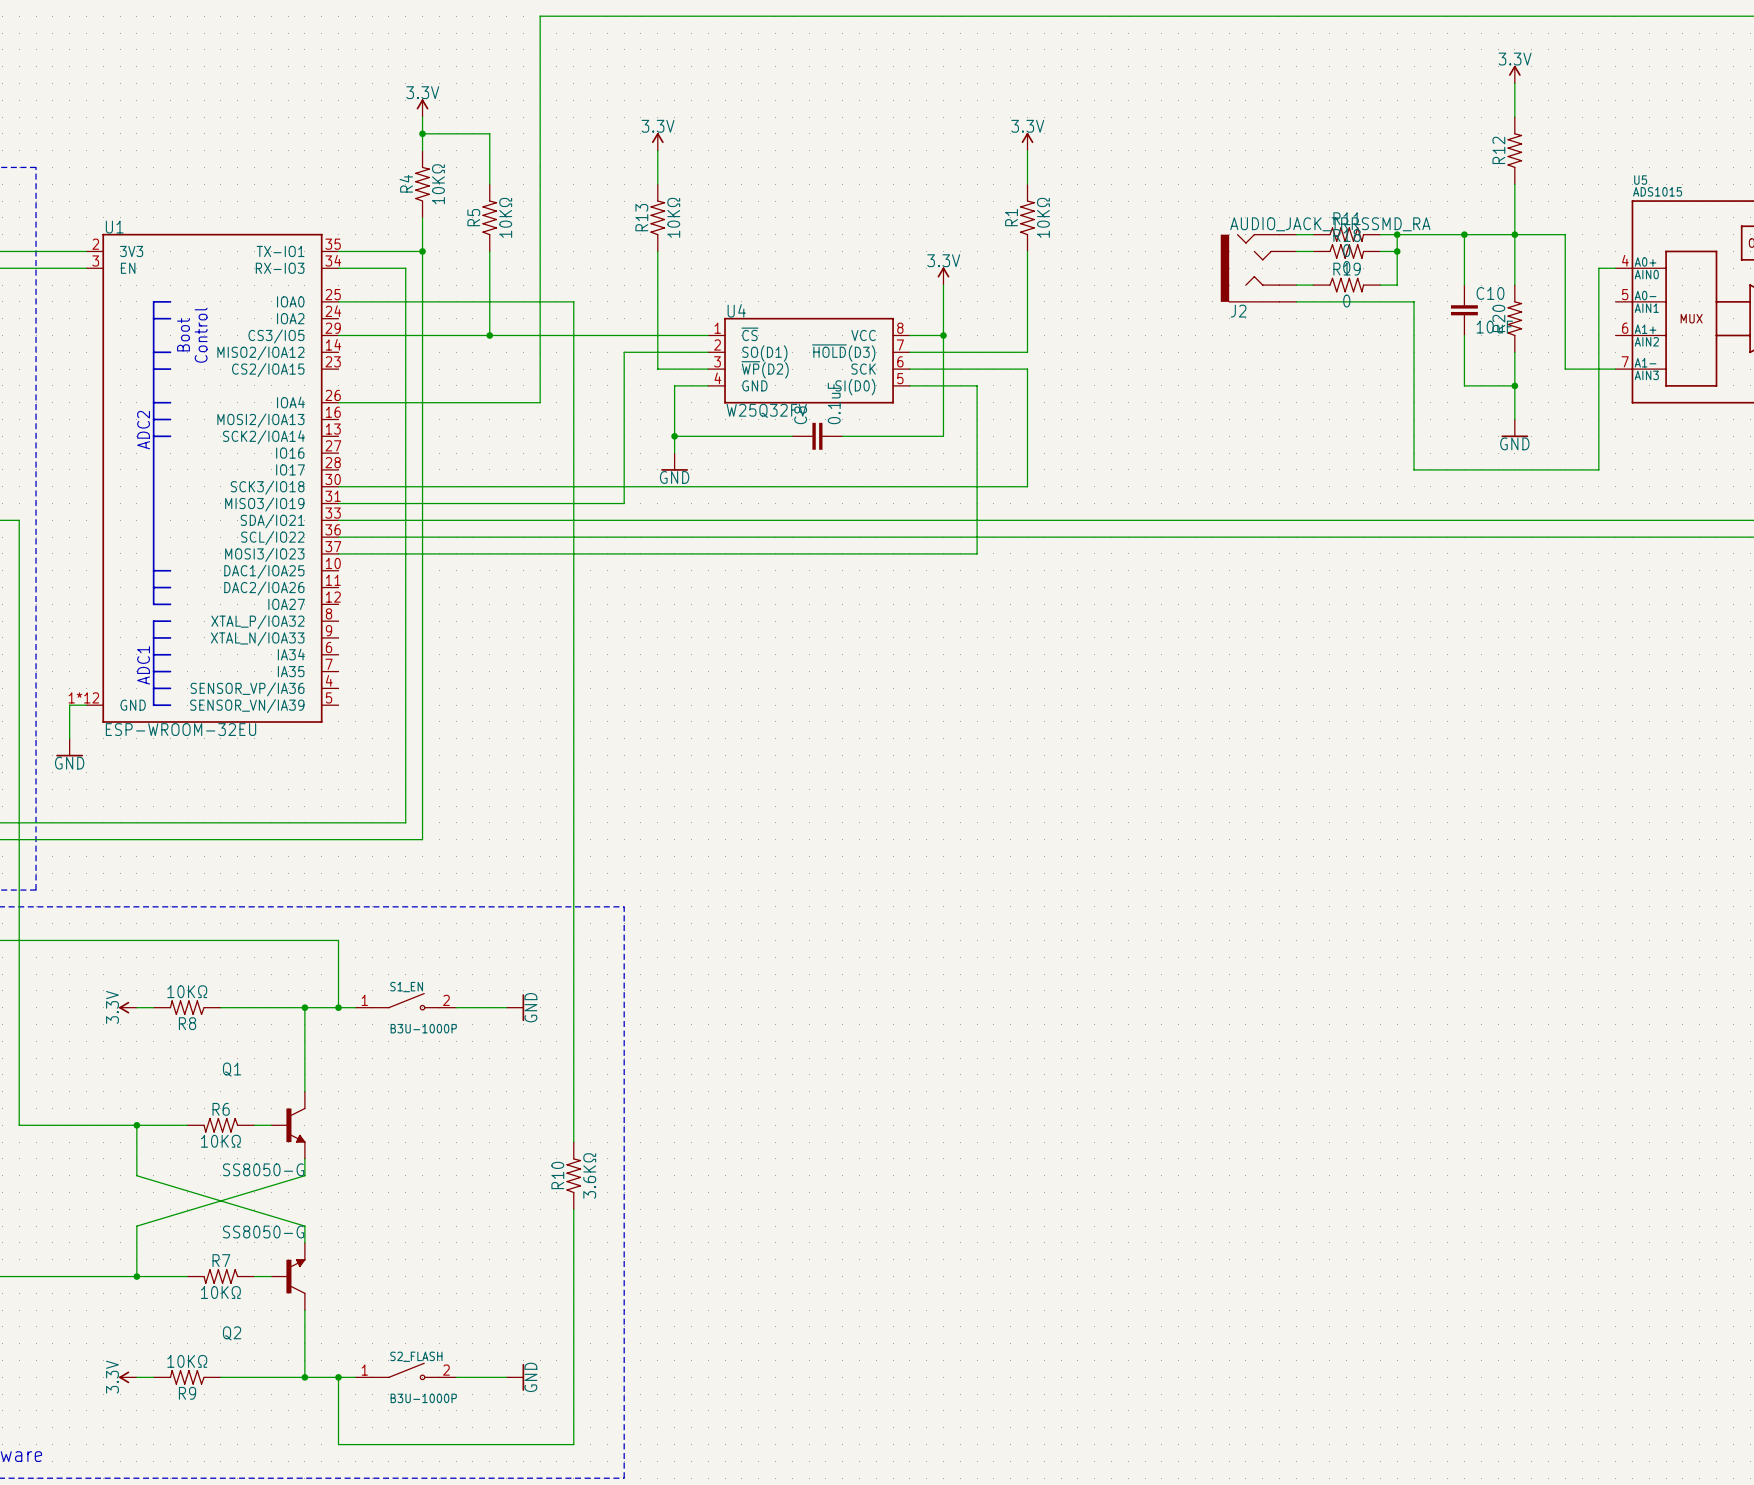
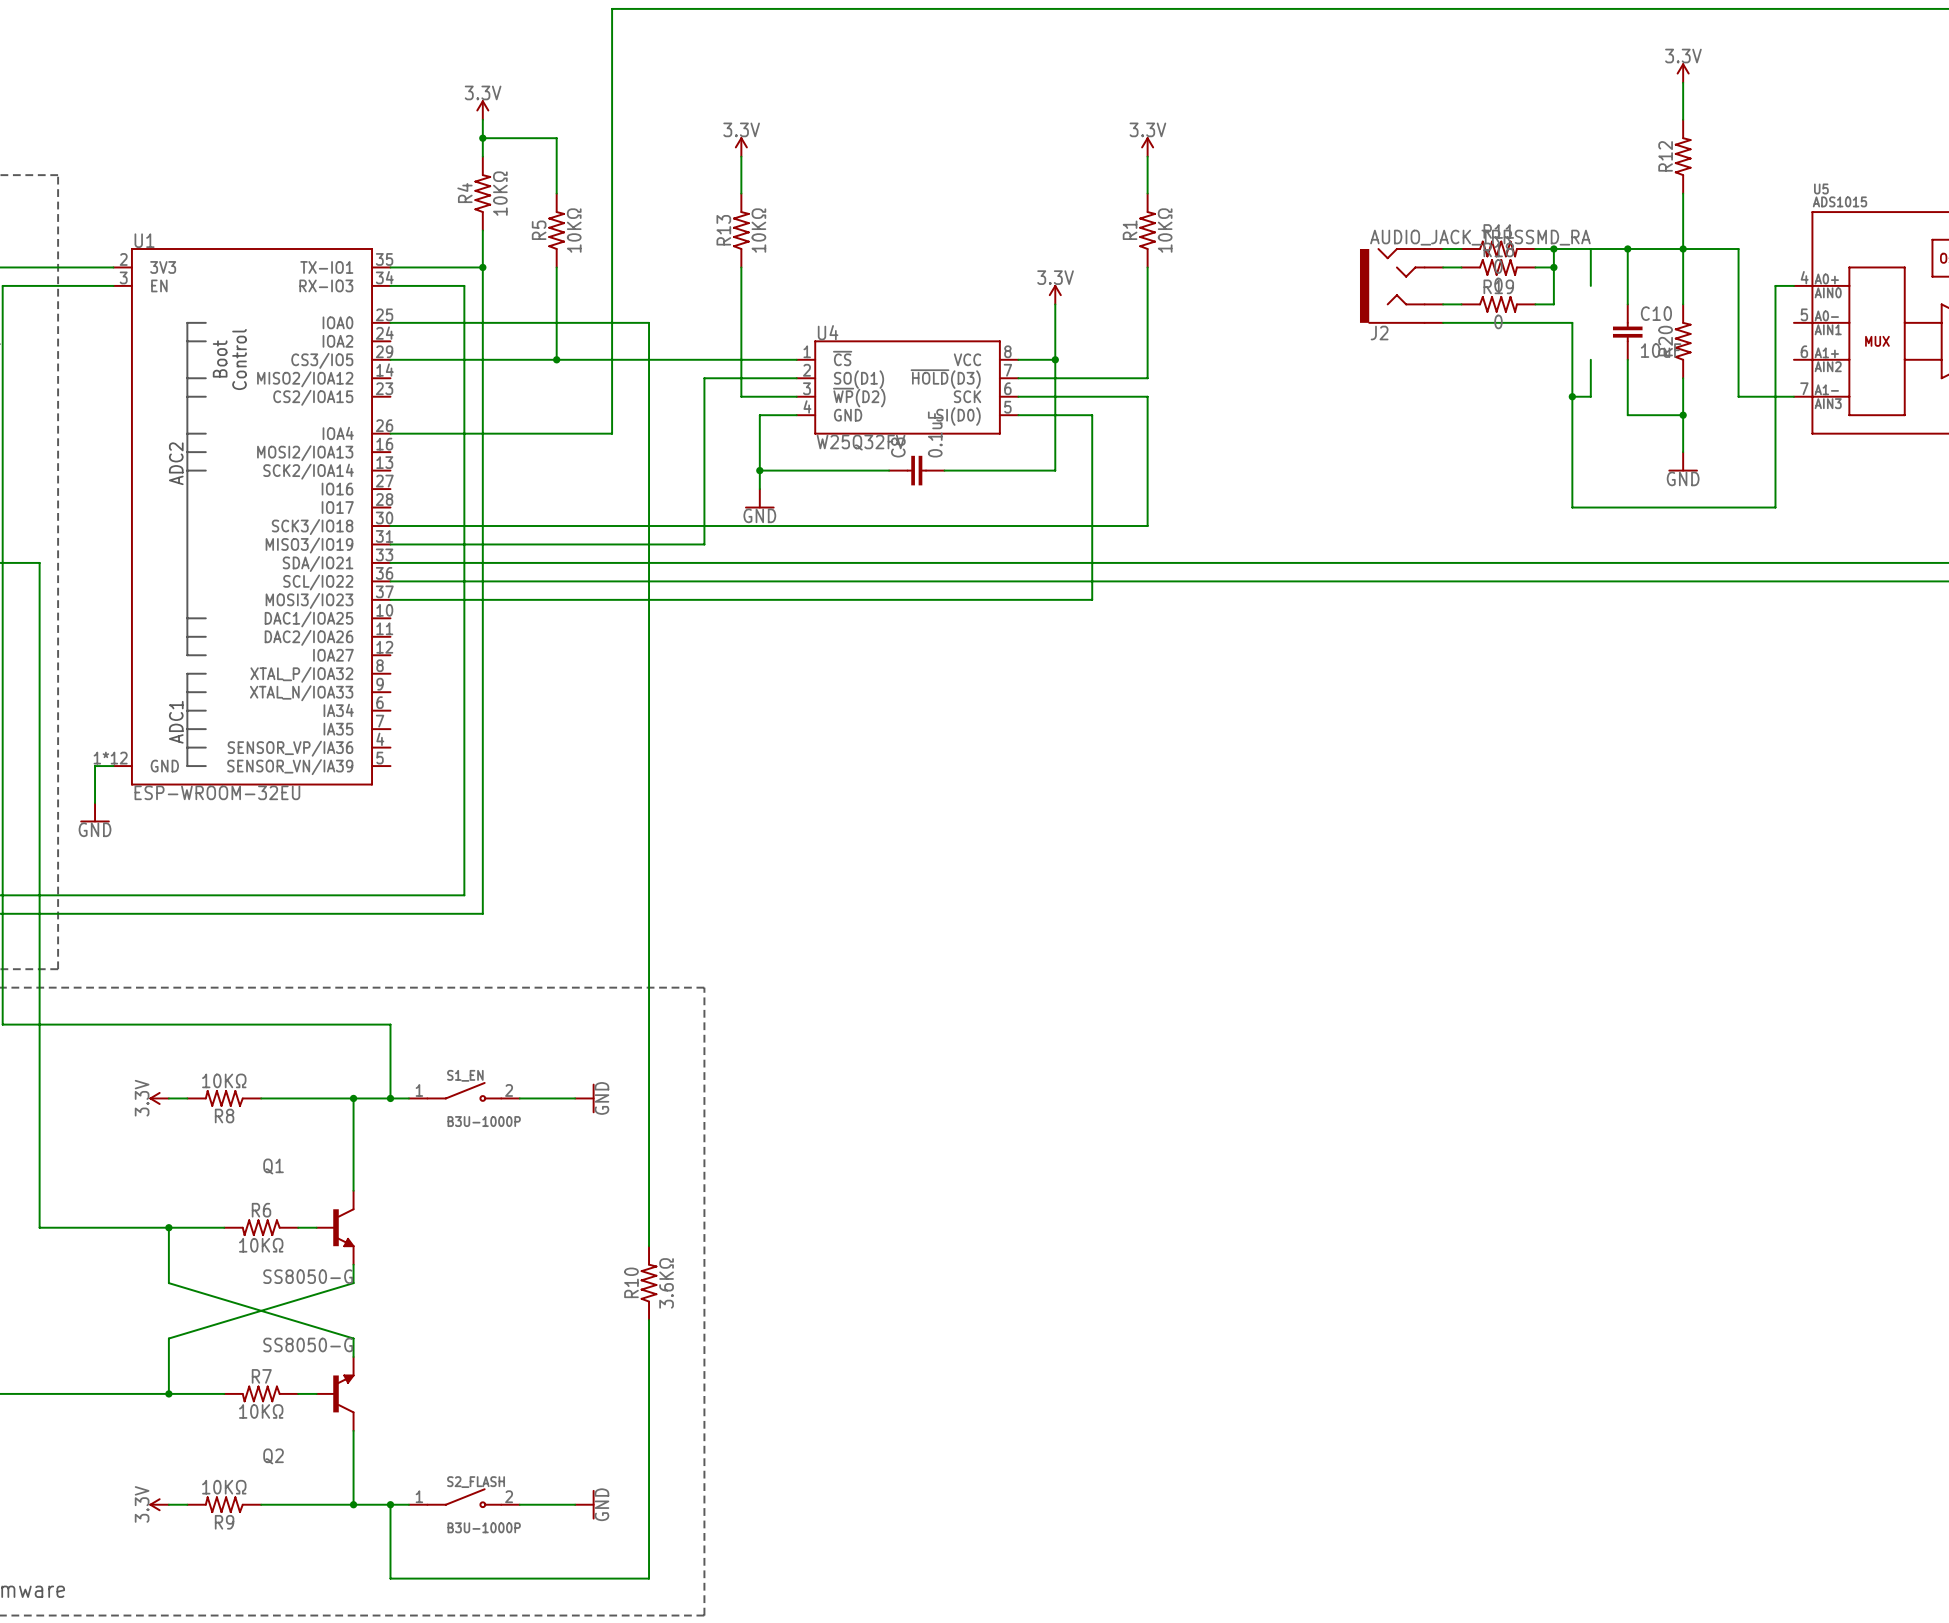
wire: none -> (1590, 249) (1590, 285)
wire: none -> (1590, 359) (1590, 396) (1572, 396)
junction: none -> (1572, 396)

